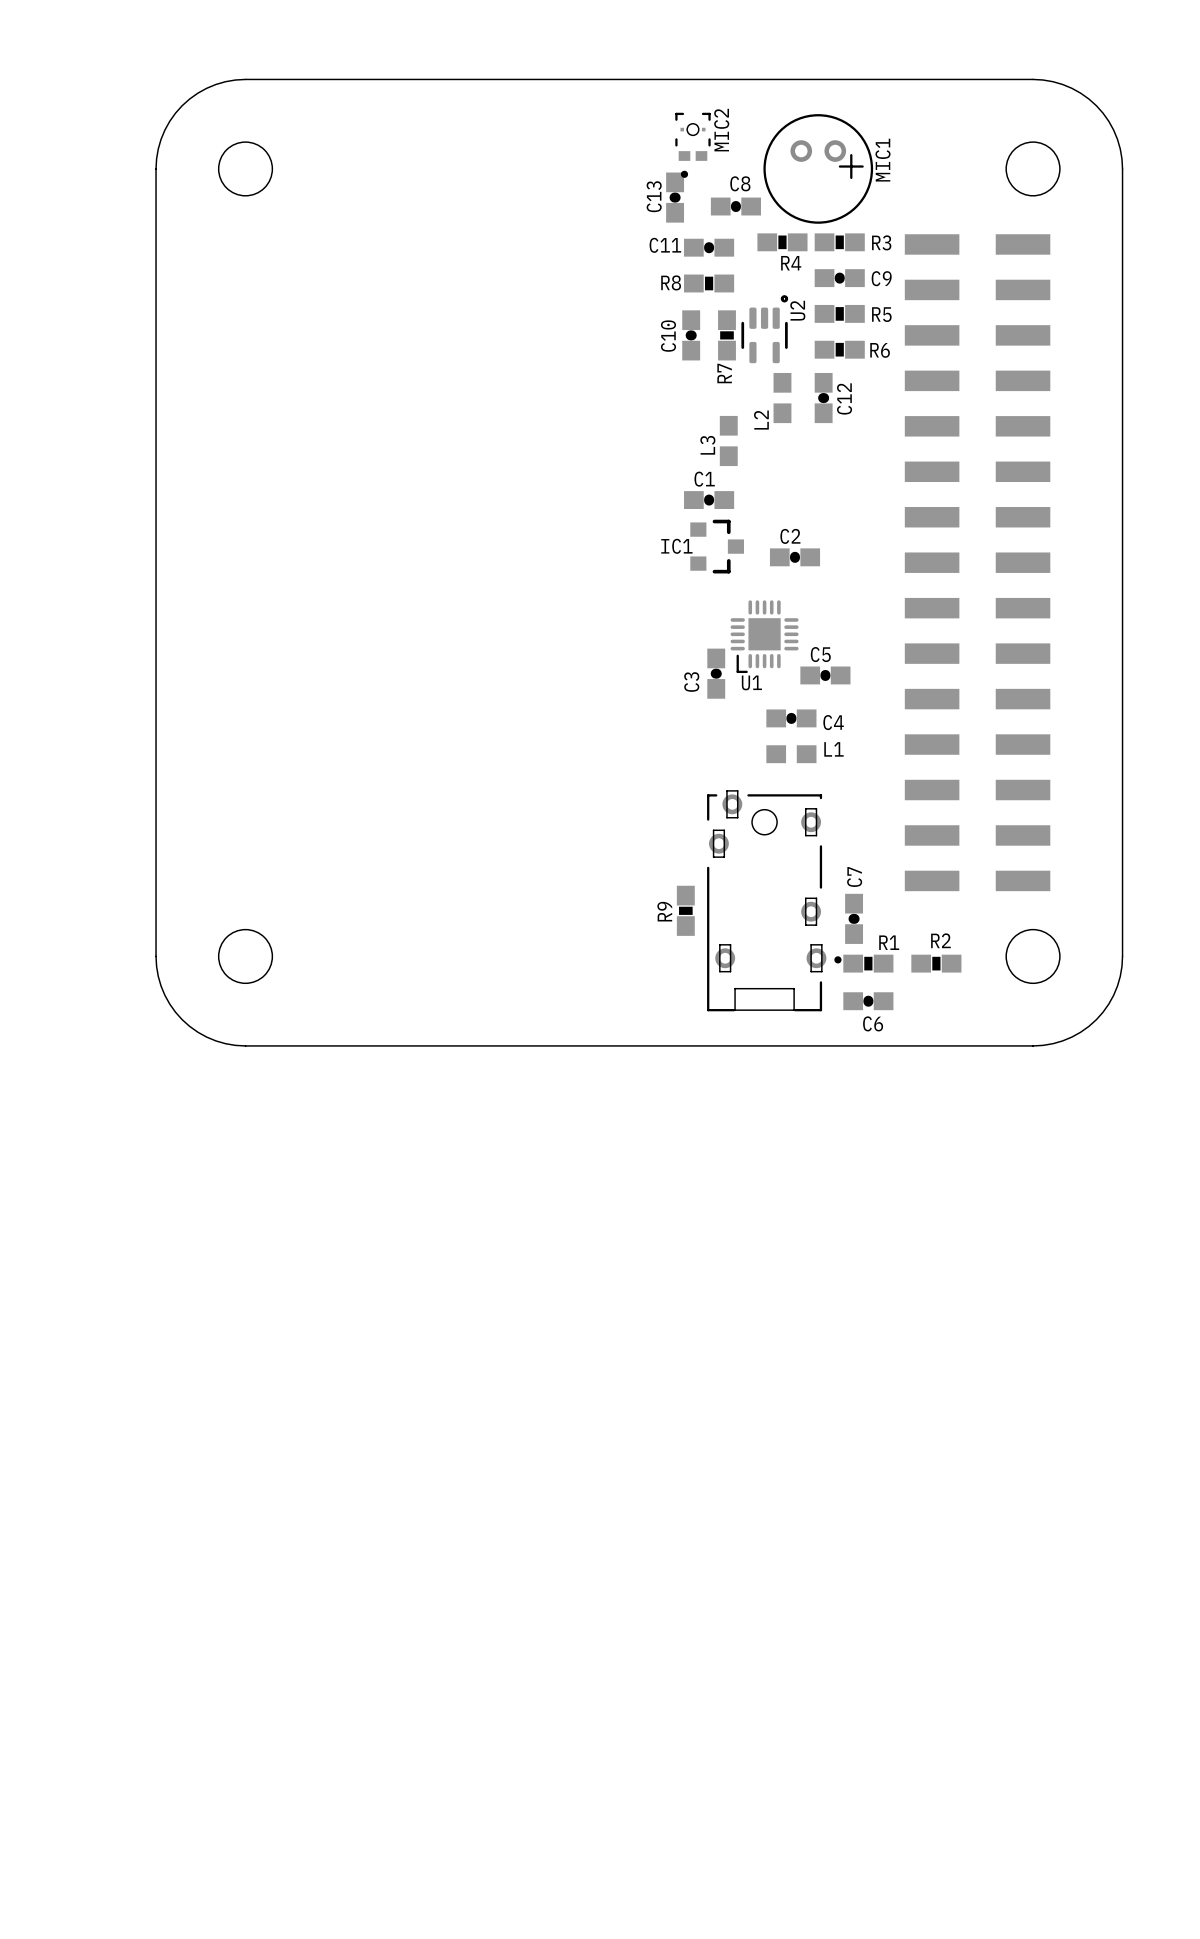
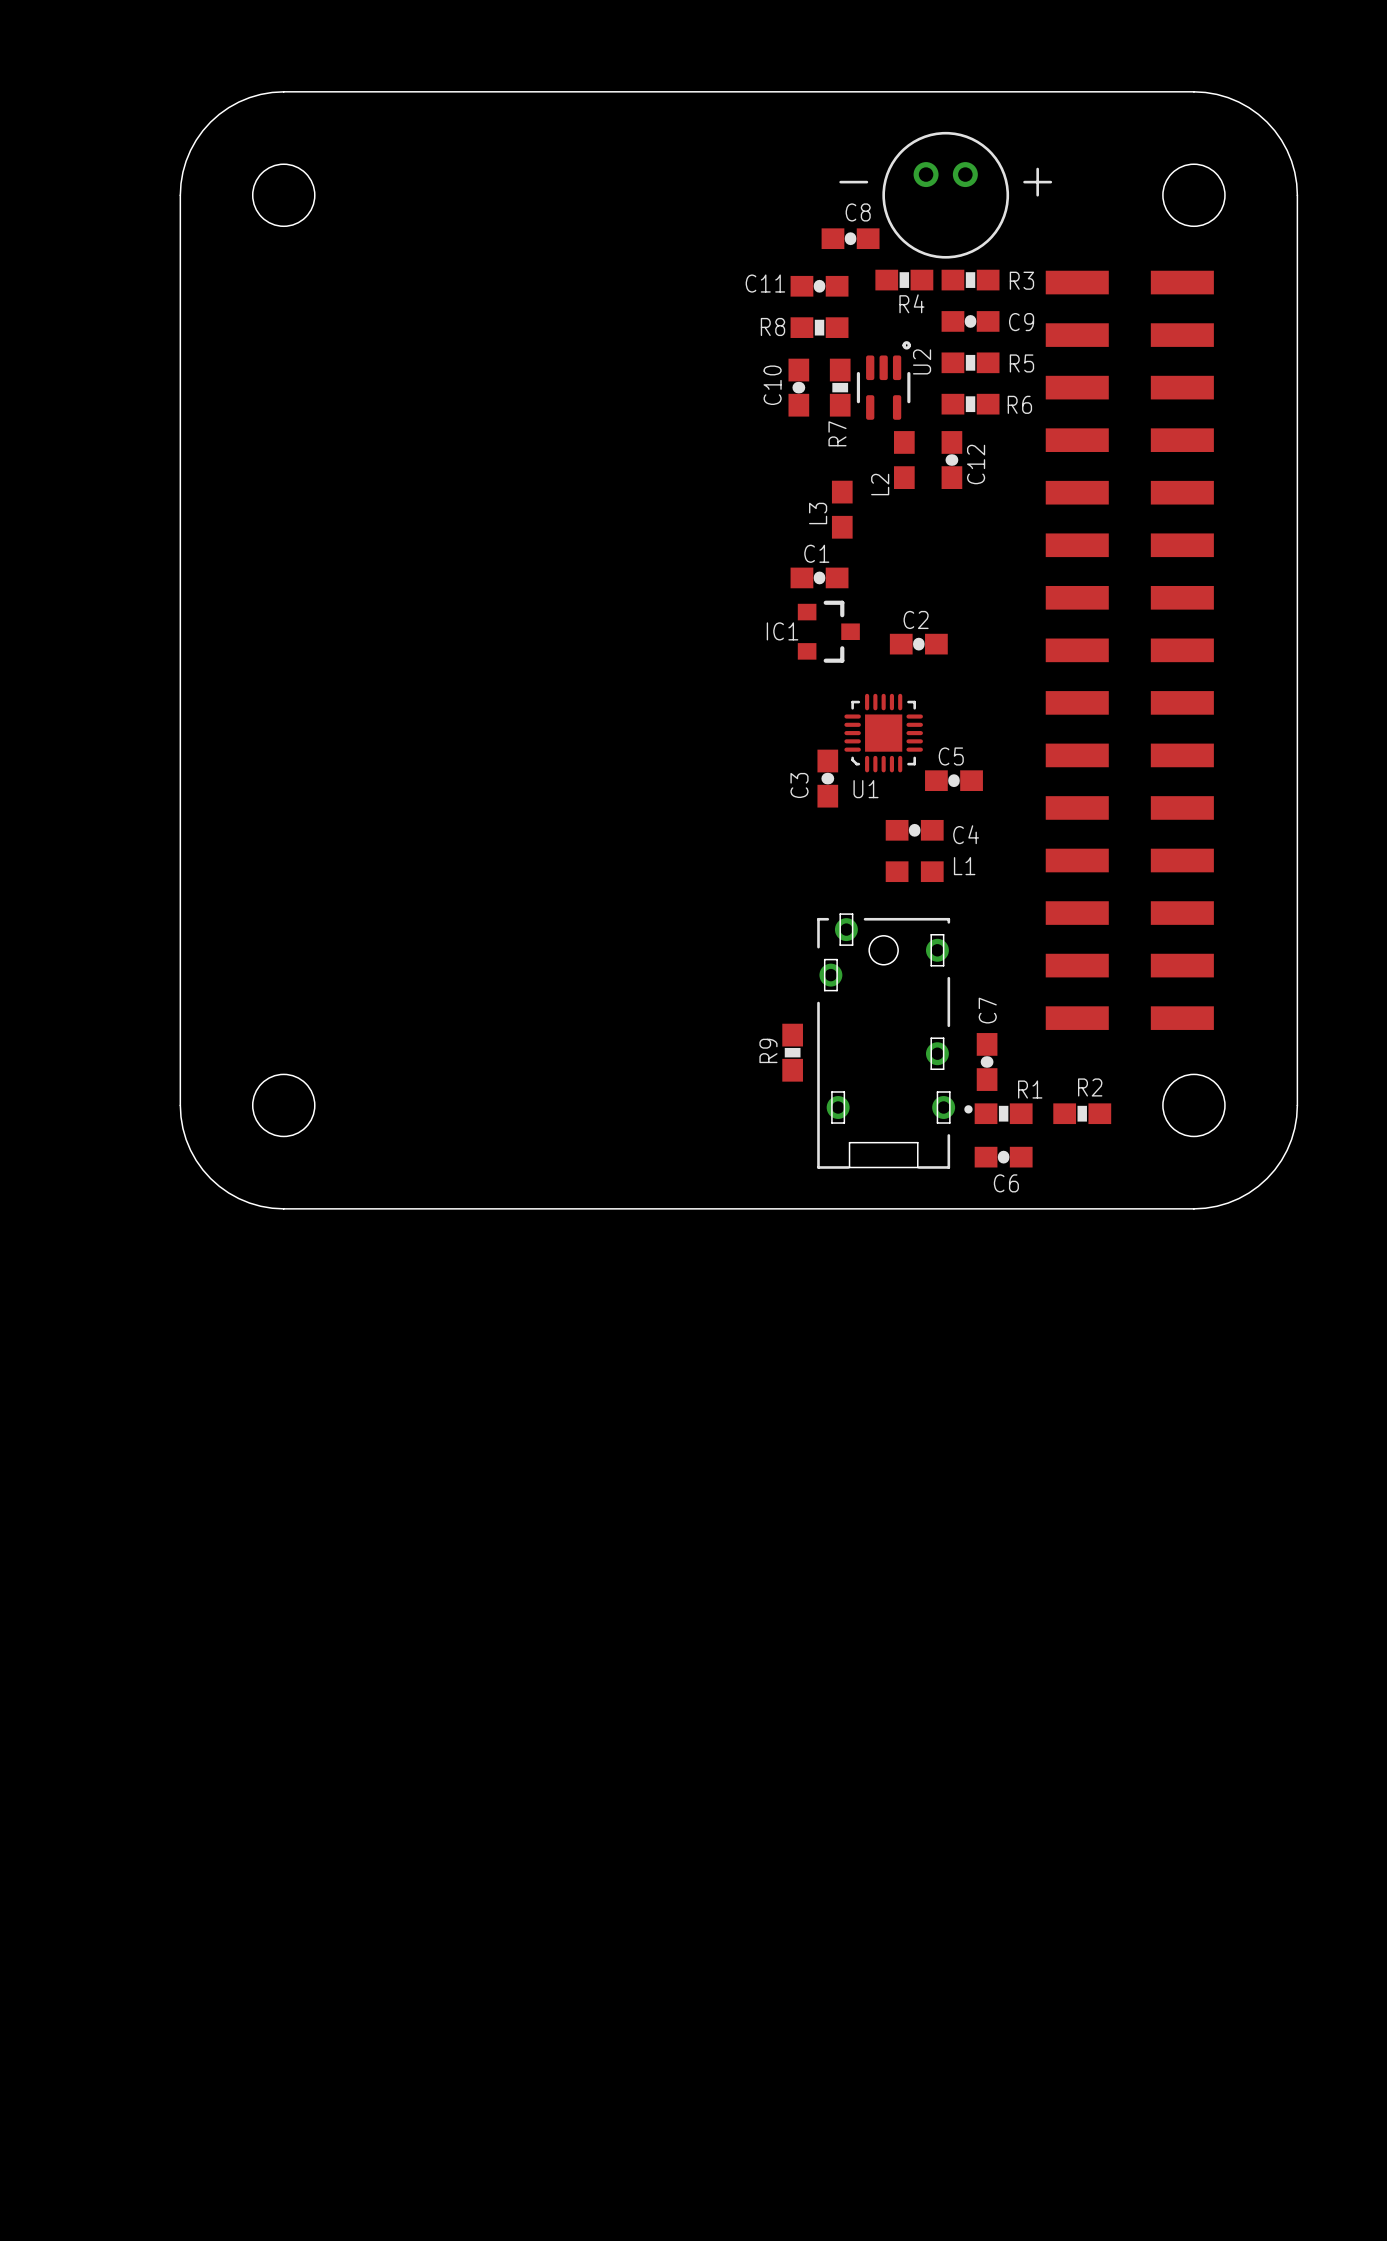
MIC2: (692, 145) -> none
MIC1: (818, 168) -> none
part: none -> (945, 195)
C13: (675, 197) -> none
U1 footprint: [730, 600, 799, 674] -> [844, 693, 923, 773]

